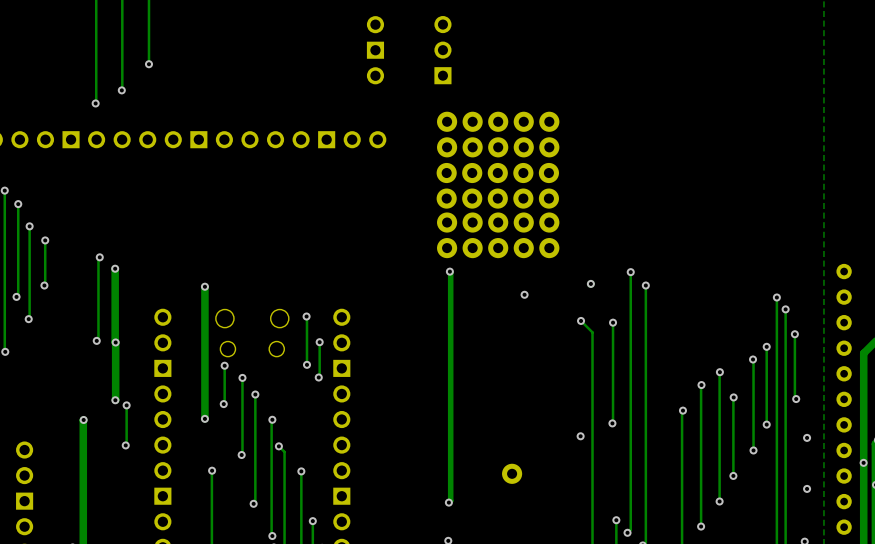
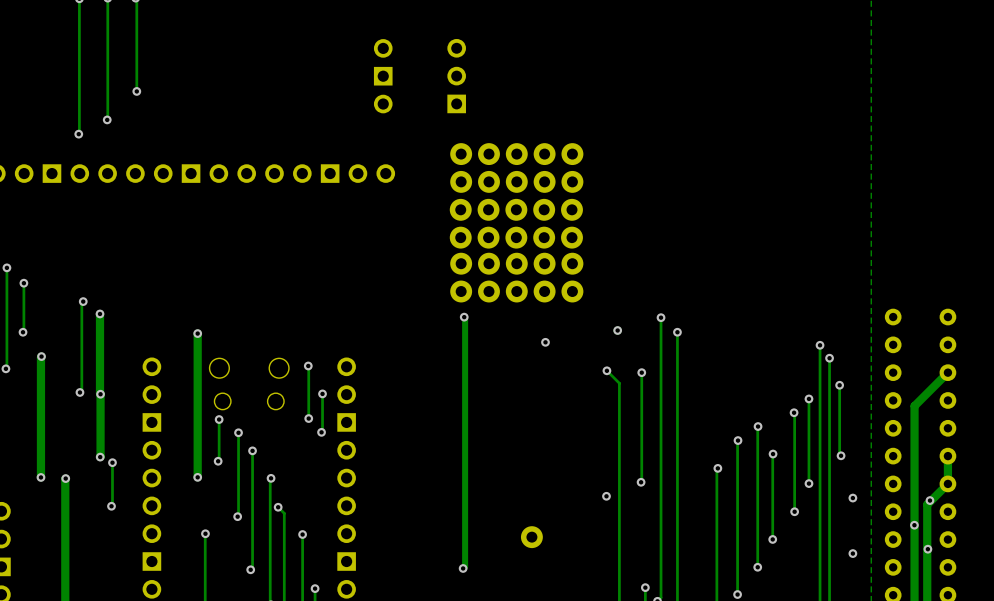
track: none -> (41, 356) (40, 477)
via: none -> (41, 356)
via: none -> (40, 477)

